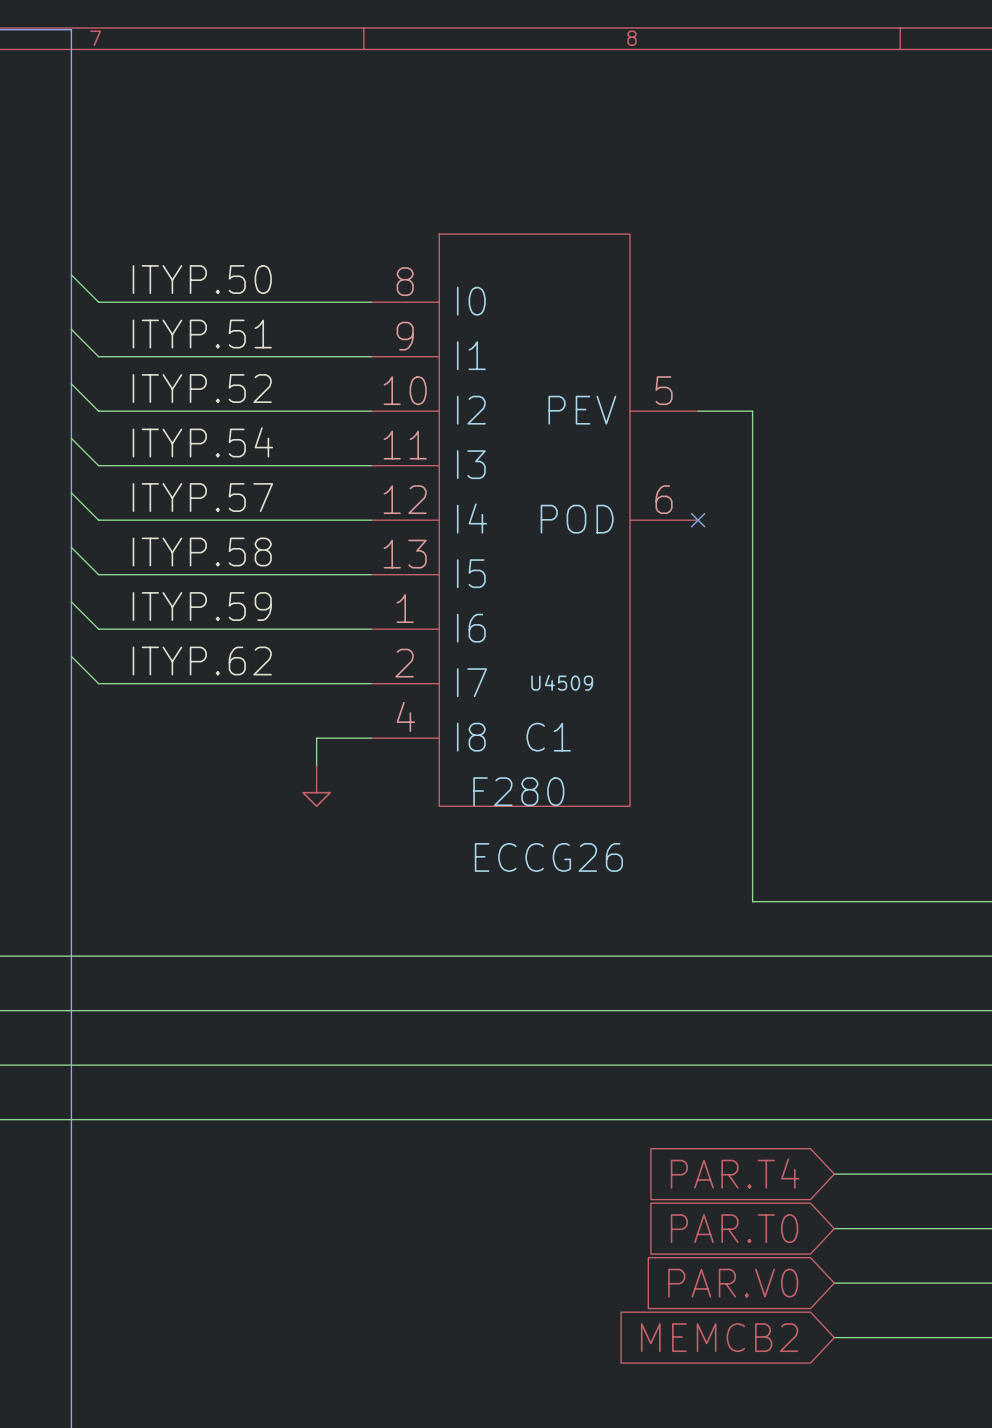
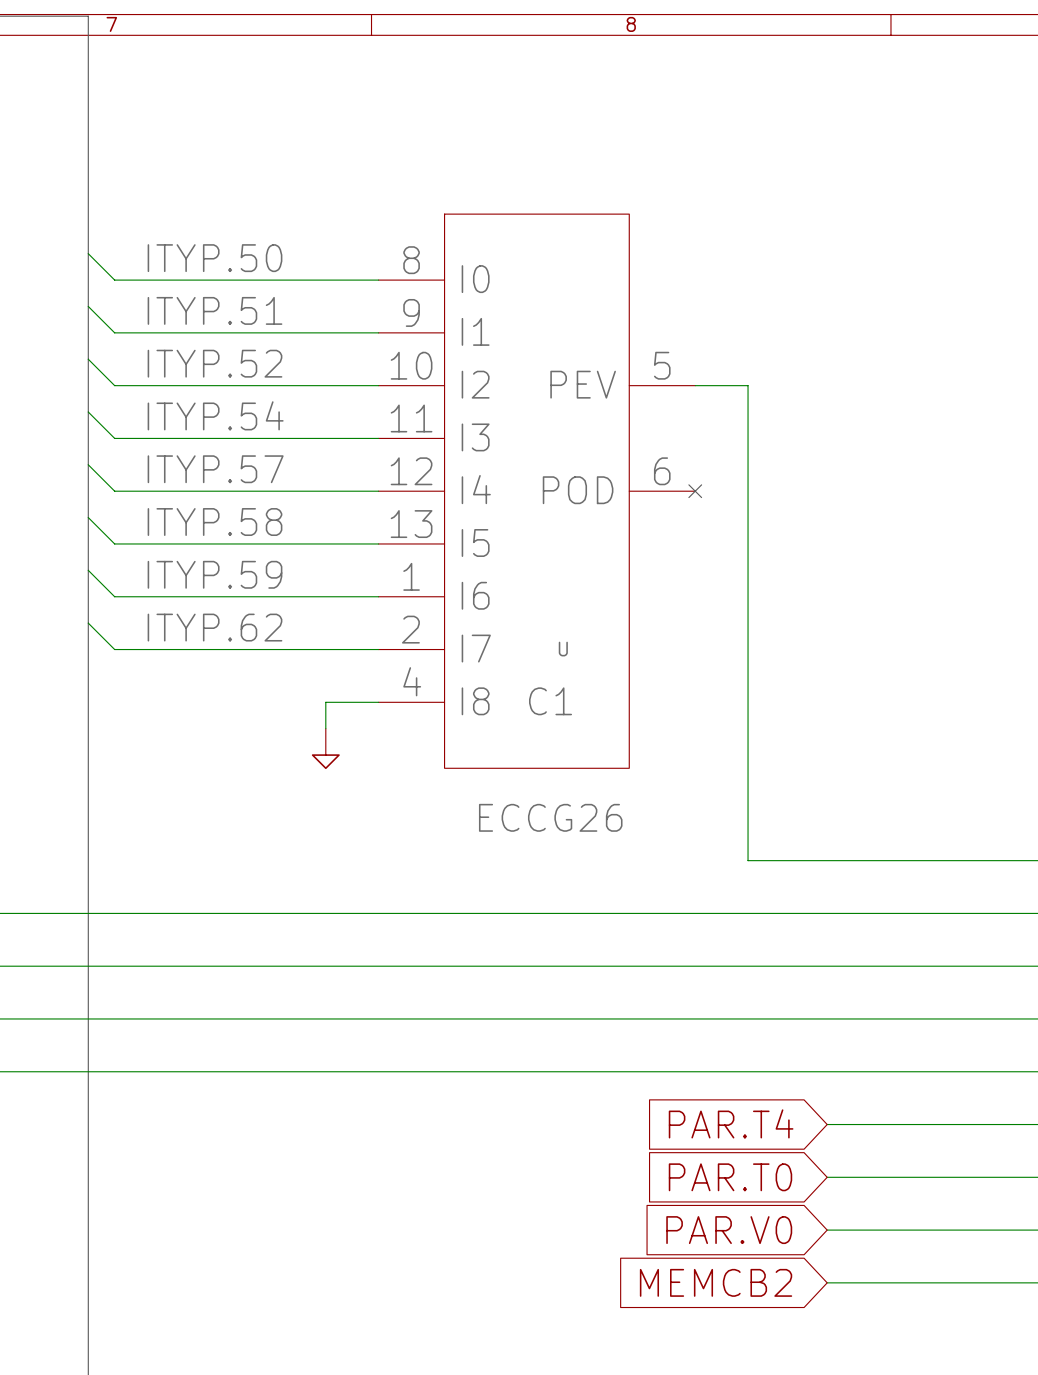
U4509 name: U4509 (562, 682) -> U (563, 649)
U4509 value: F280 (518, 791) -> none

